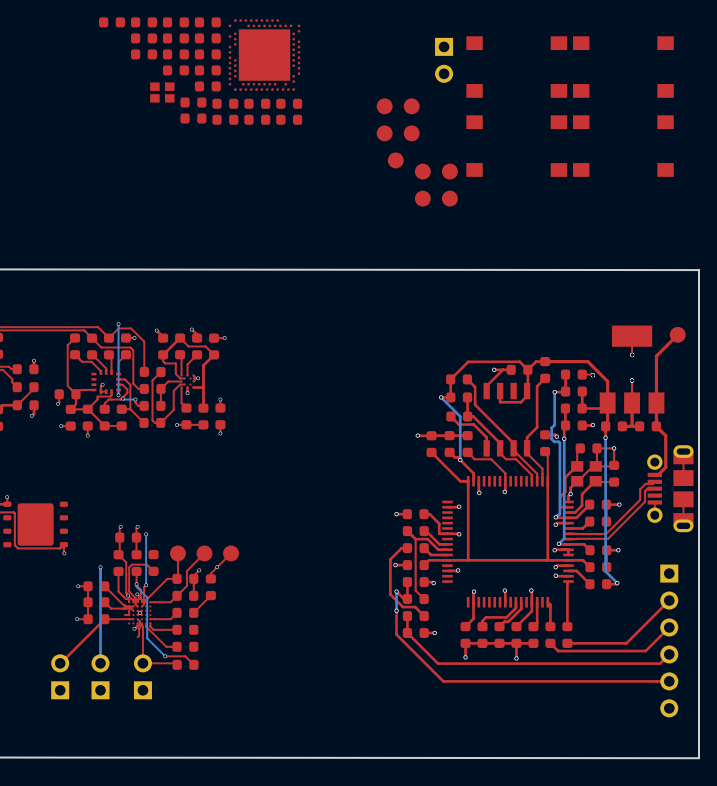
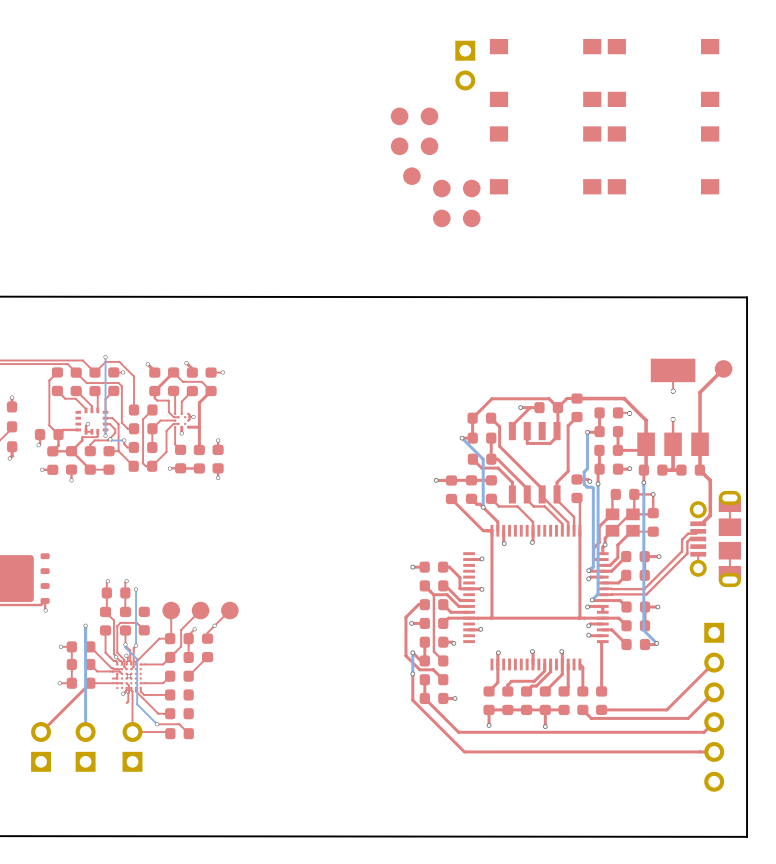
part: (112, 22) -> none
part: (143, 22) -> none
part: (175, 22) -> none
part: (207, 22) -> none
part: (143, 38) -> none
part: (175, 38) -> none
part: (207, 38) -> none
part: (143, 54) -> none
part: (175, 54) -> none
part: (207, 54) -> none
part: (264, 55) -> none
part: (175, 70) -> none
part: (207, 70) -> none
part: (207, 86) -> none
part: (162, 92) -> none
part: (193, 102) -> none
part: (225, 103) -> none
part: (257, 103) -> none
part: (289, 103) -> none
part: (193, 118) -> none
part: (225, 119) -> none
part: (257, 119) -> none
part: (289, 119) -> none

